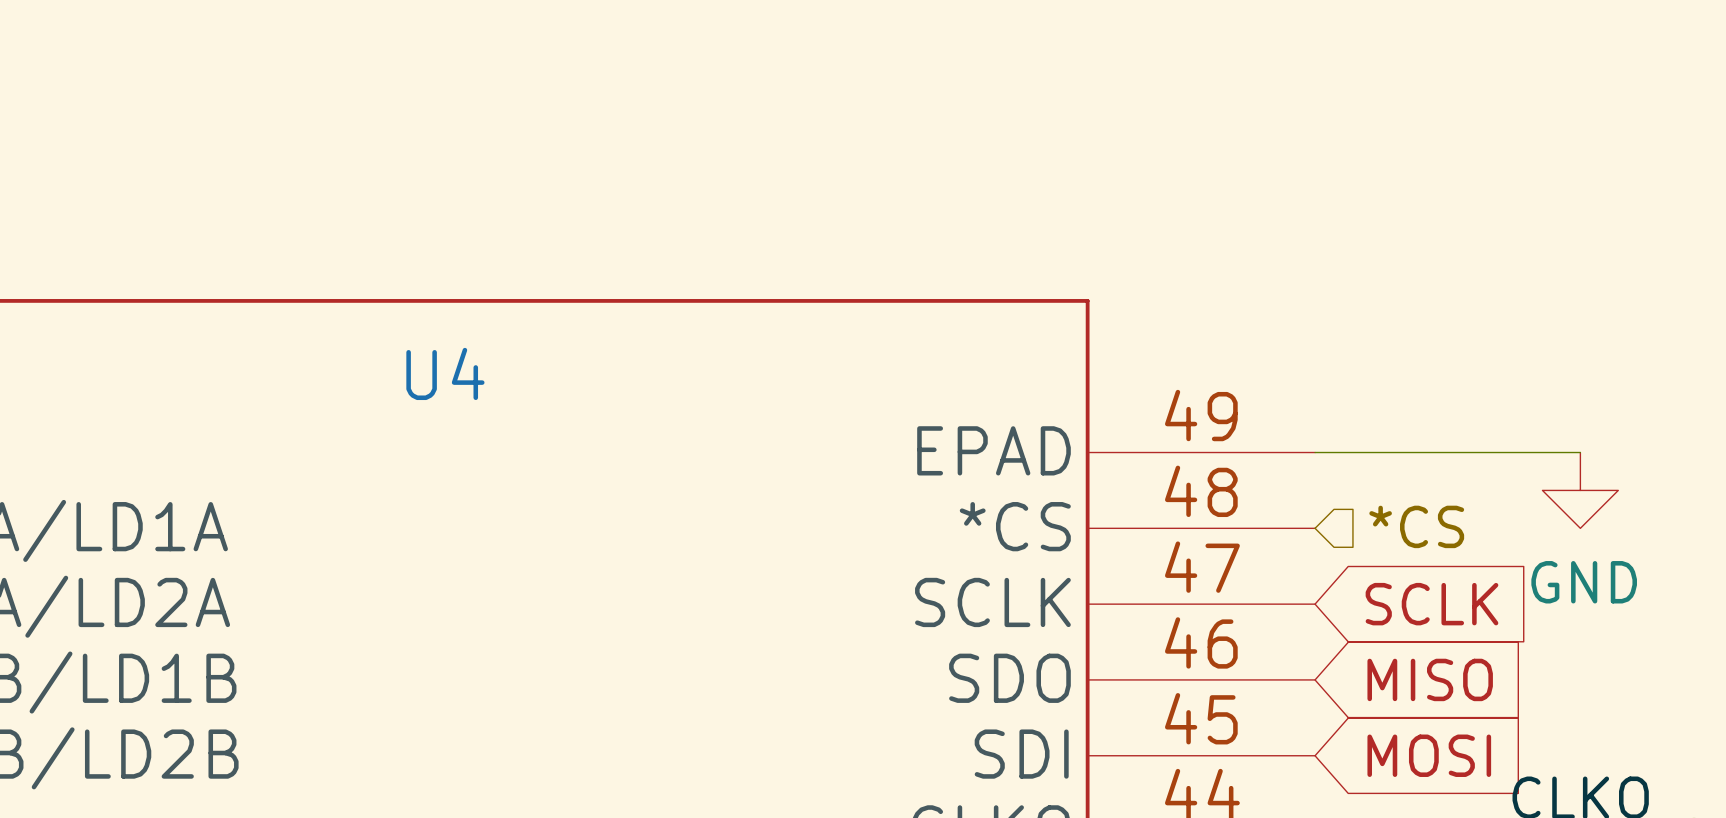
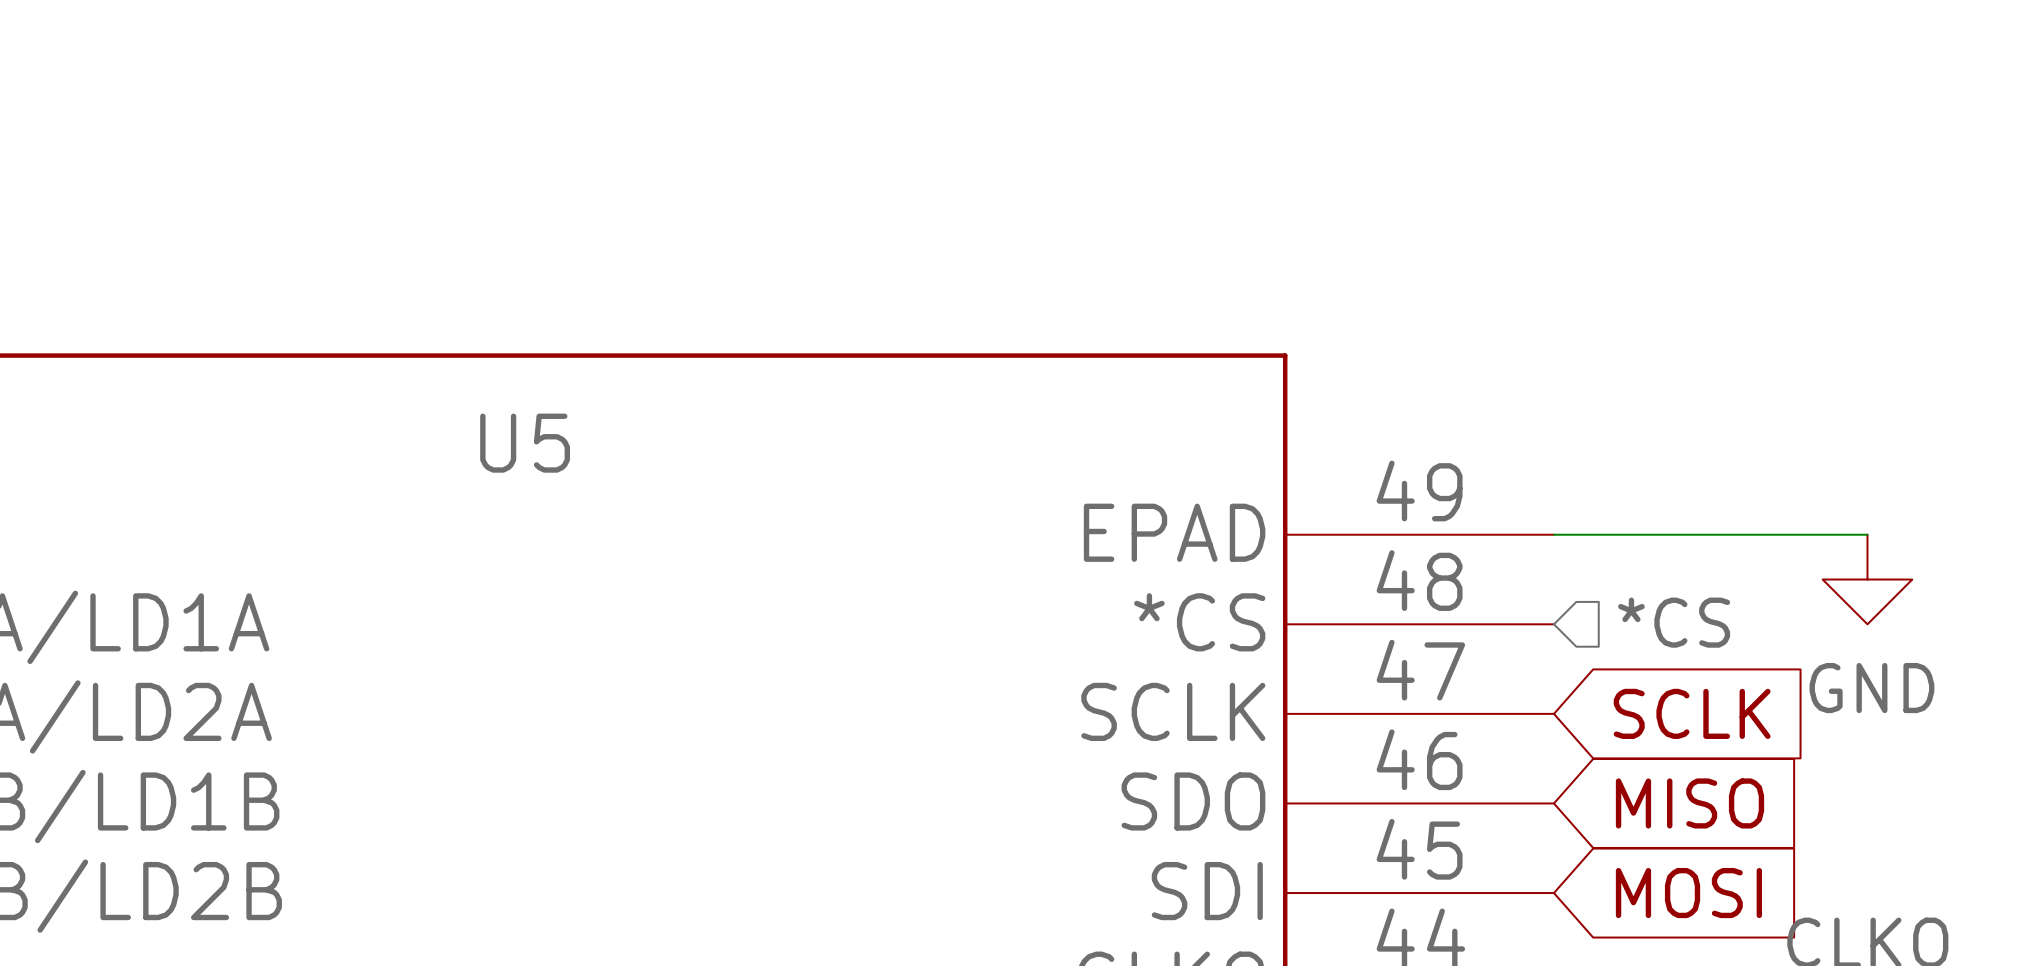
U4 name: U4 (445, 373) -> U5 (525, 443)

